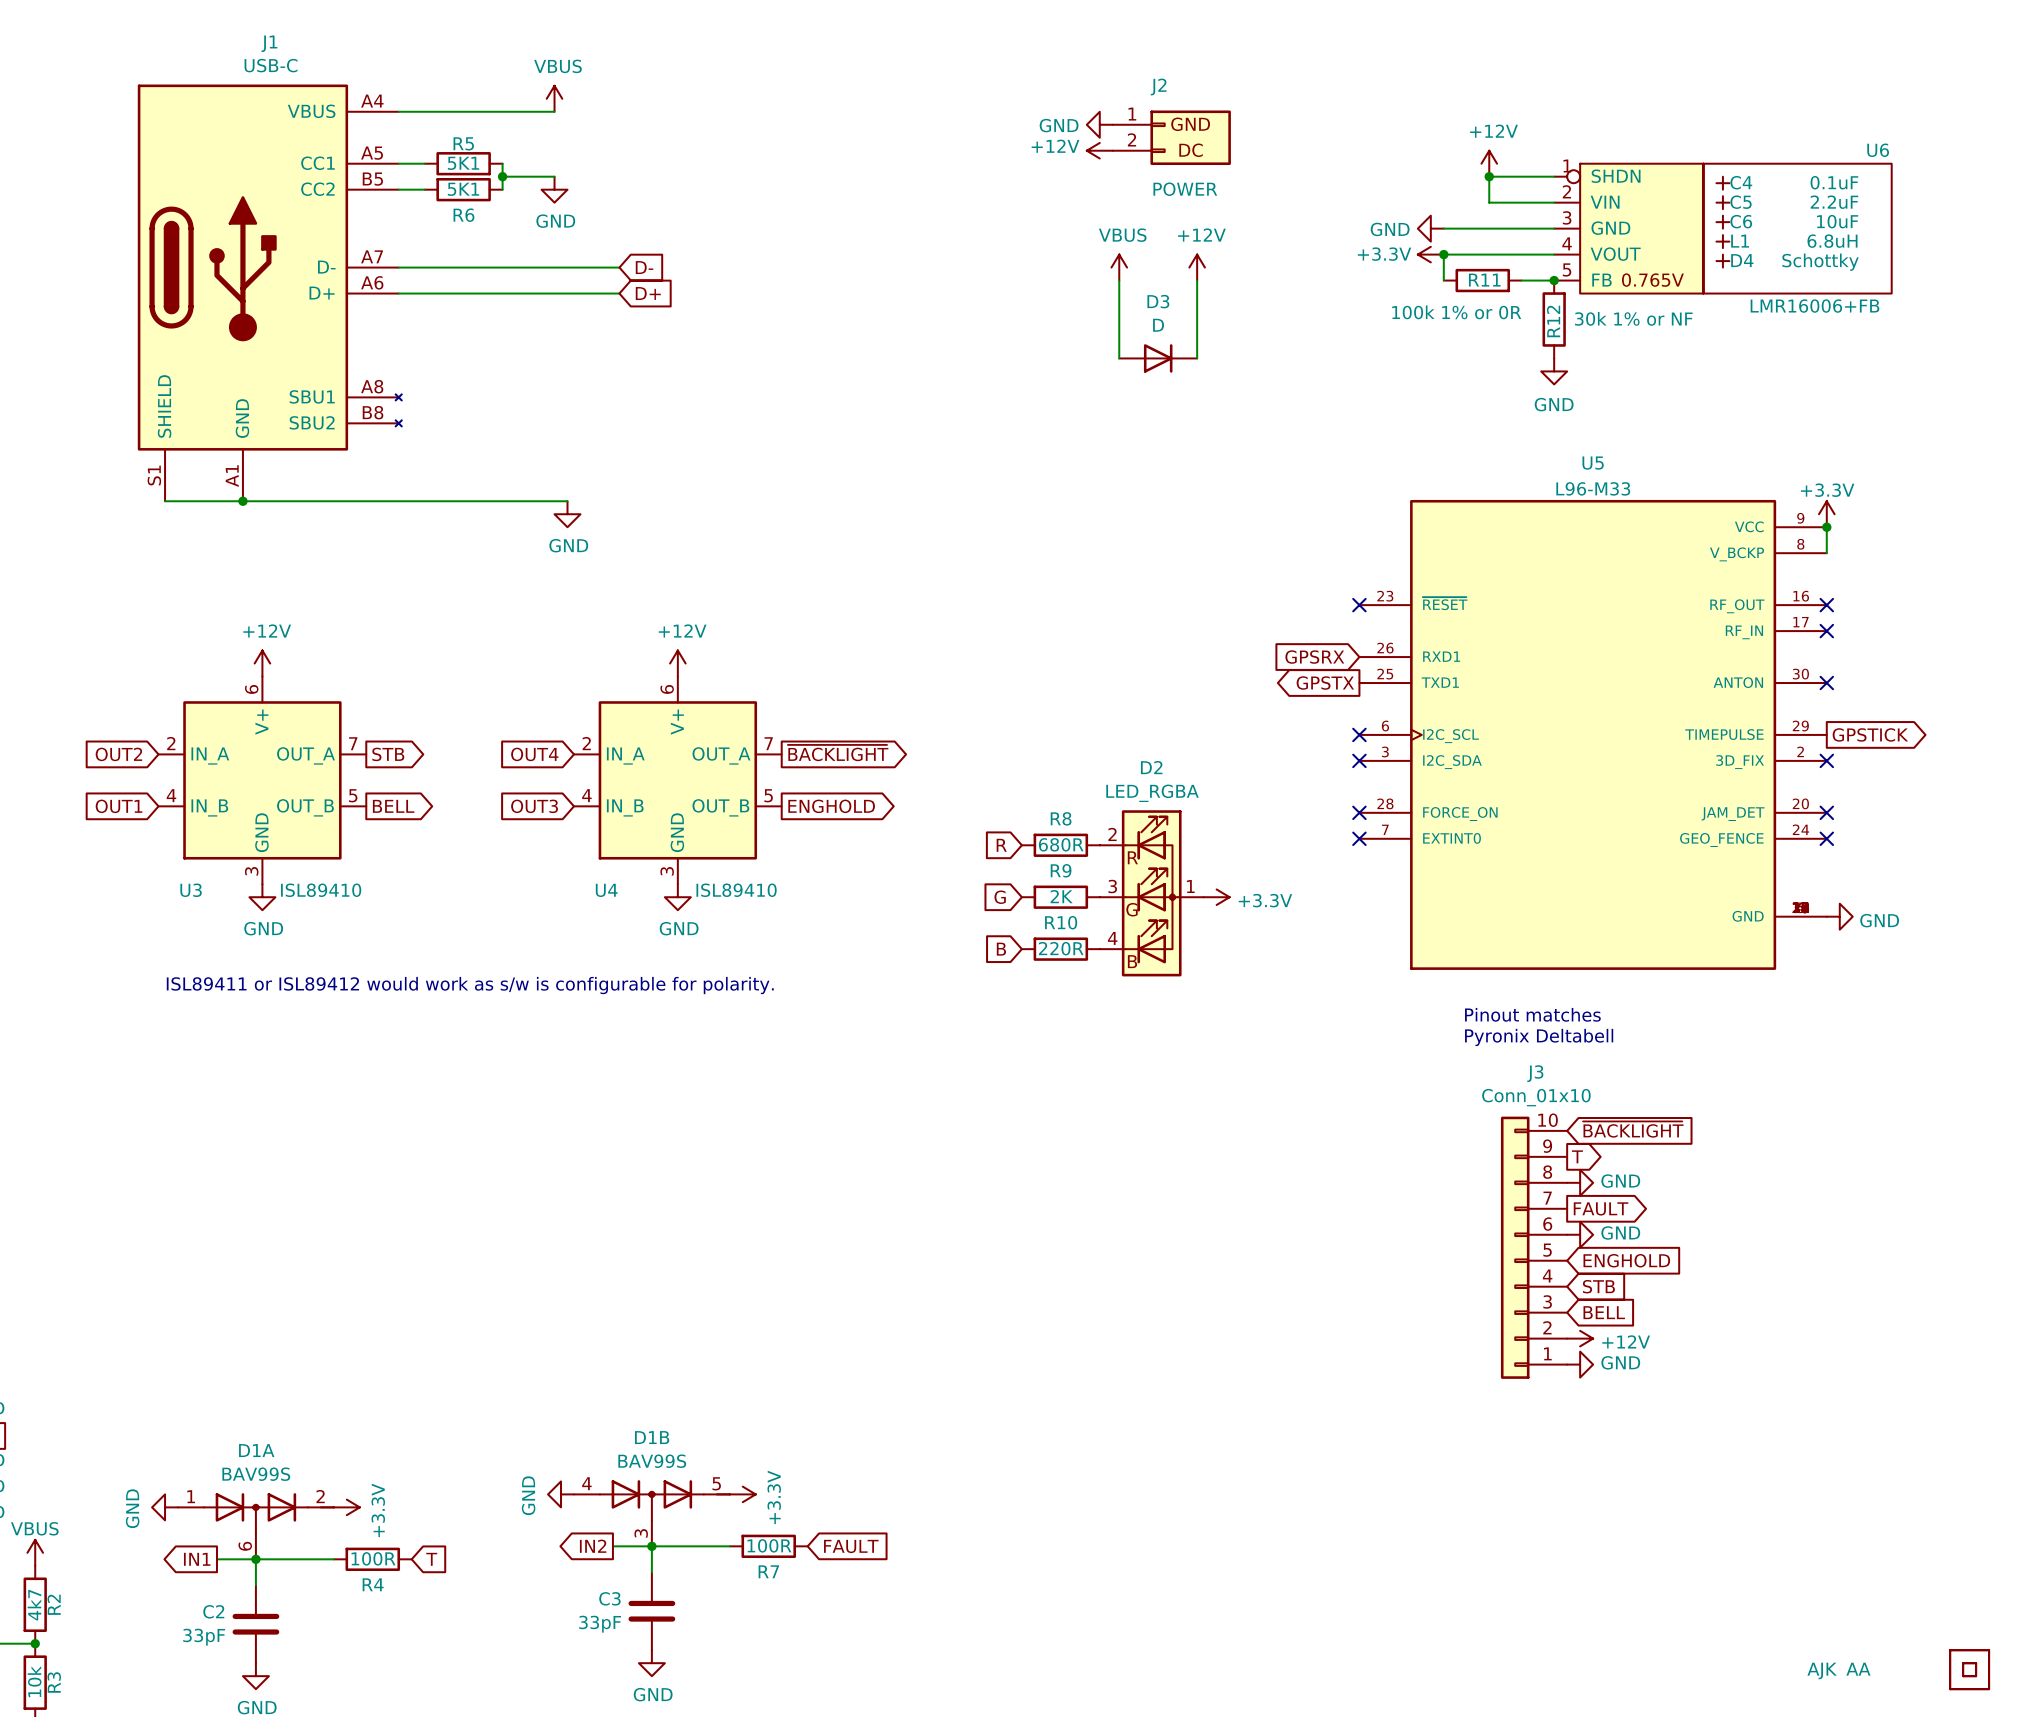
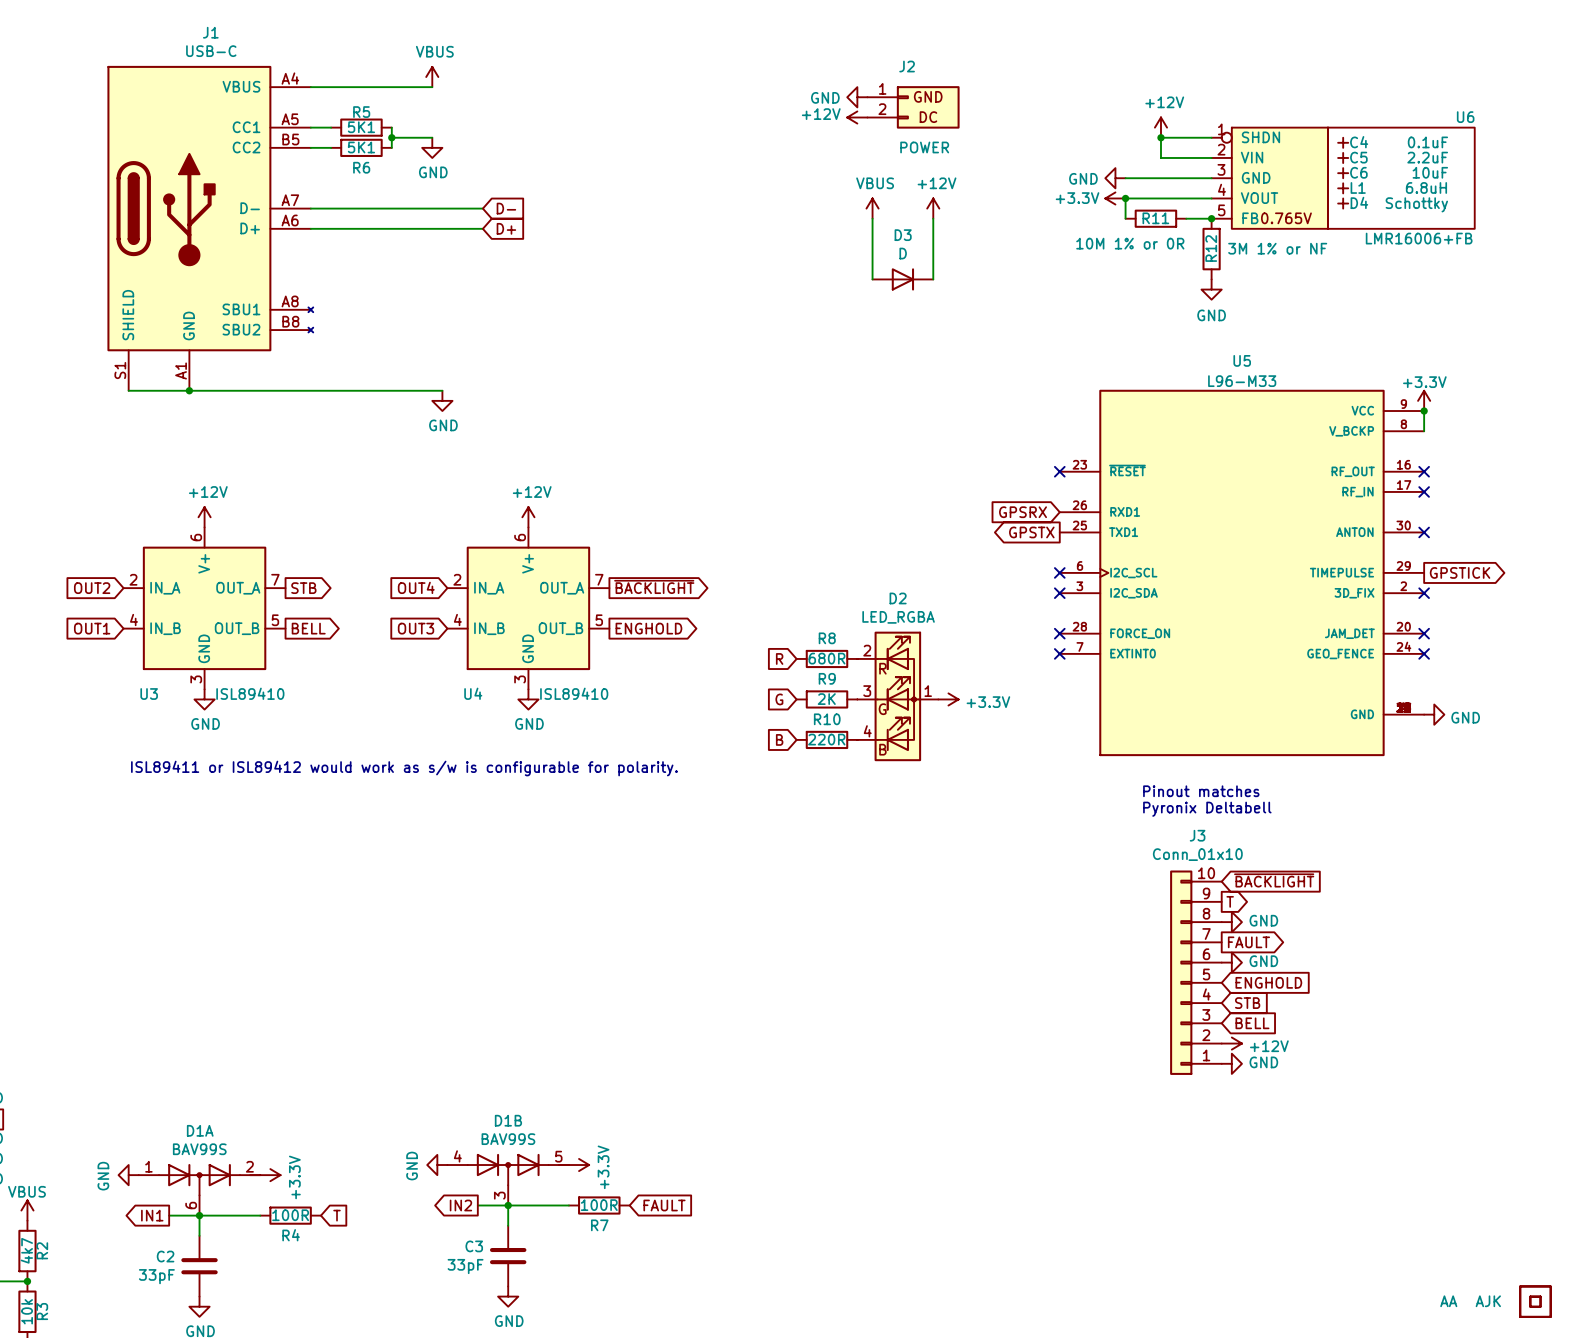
R11 value: 100k 1% or 0R (1456, 312) -> 10M 1% or 0R (1130, 243)
R12 value: 30k 1% or NF (1633, 318) -> 3M 1% or NF (1277, 248)
part position: (1822, 1670) -> (1488, 1301)

